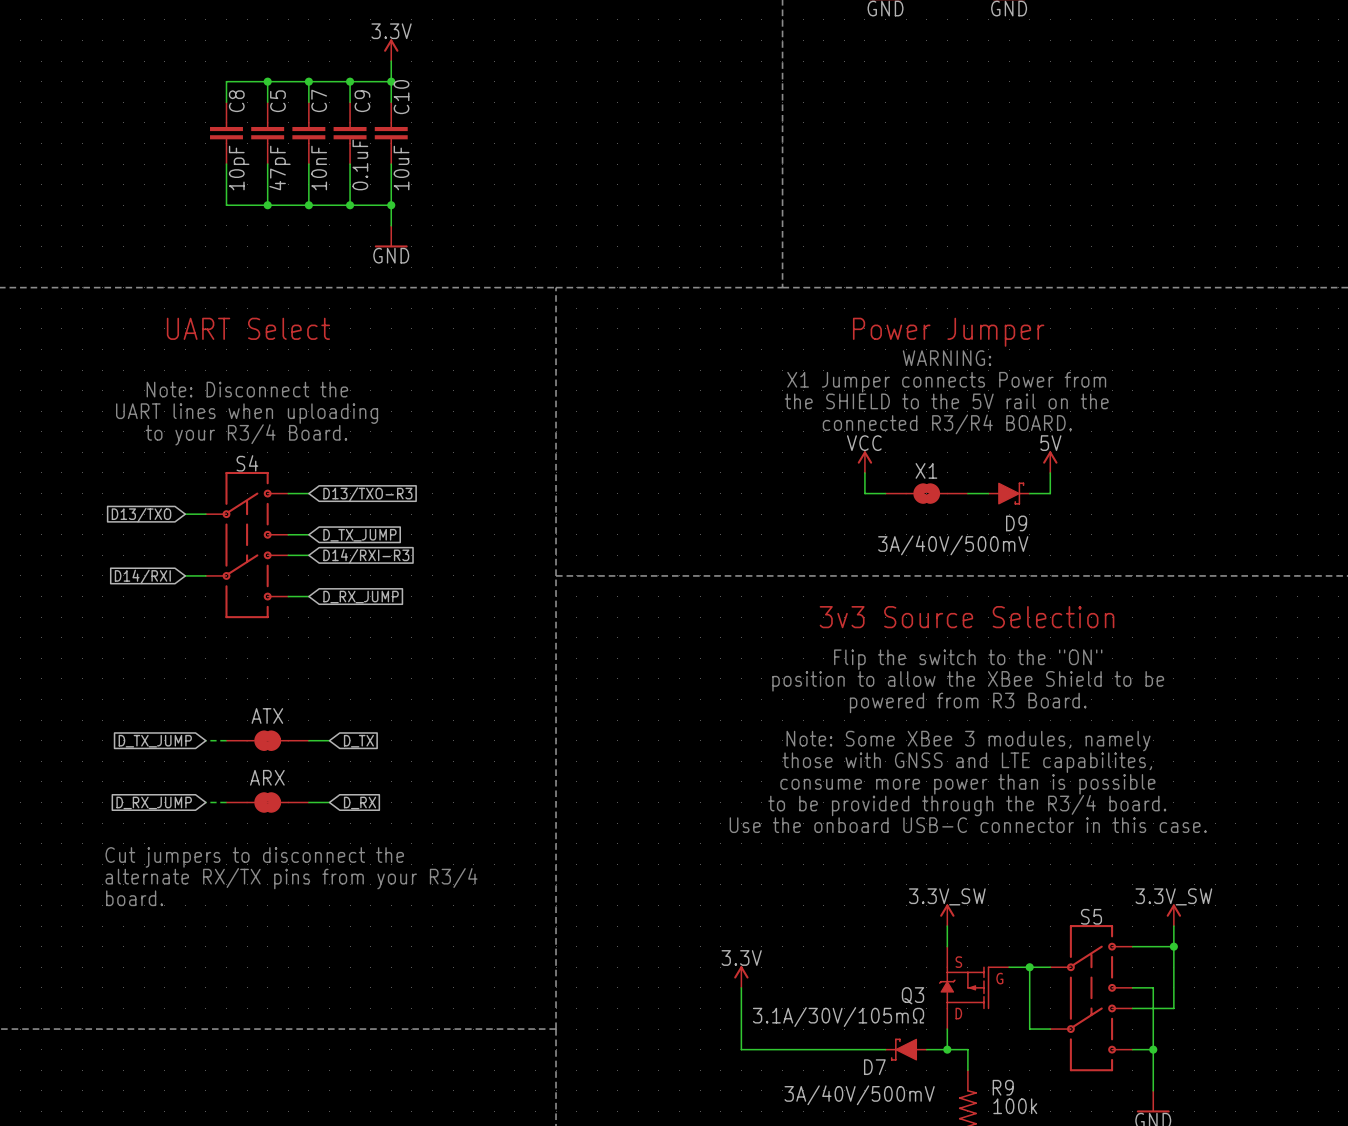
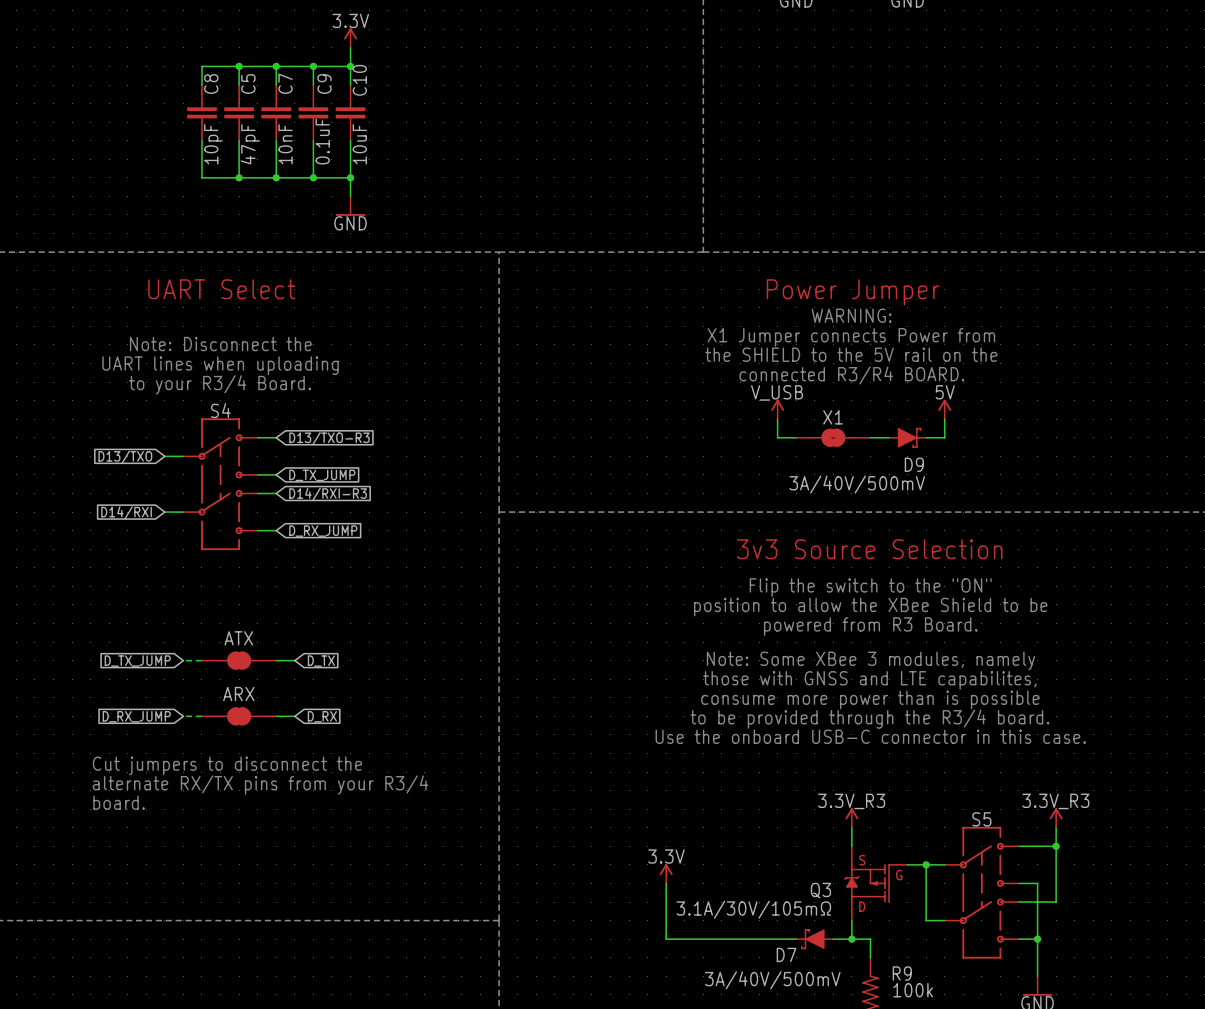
power symbol: VCC (864, 462) -> V_USB (777, 409)
power symbol: 3.3V_SW (947, 915) -> 3.3V_R3 (851, 817)
power symbol: 3.3V_SW (1173, 915) -> 3.3V_R3 (1056, 817)

